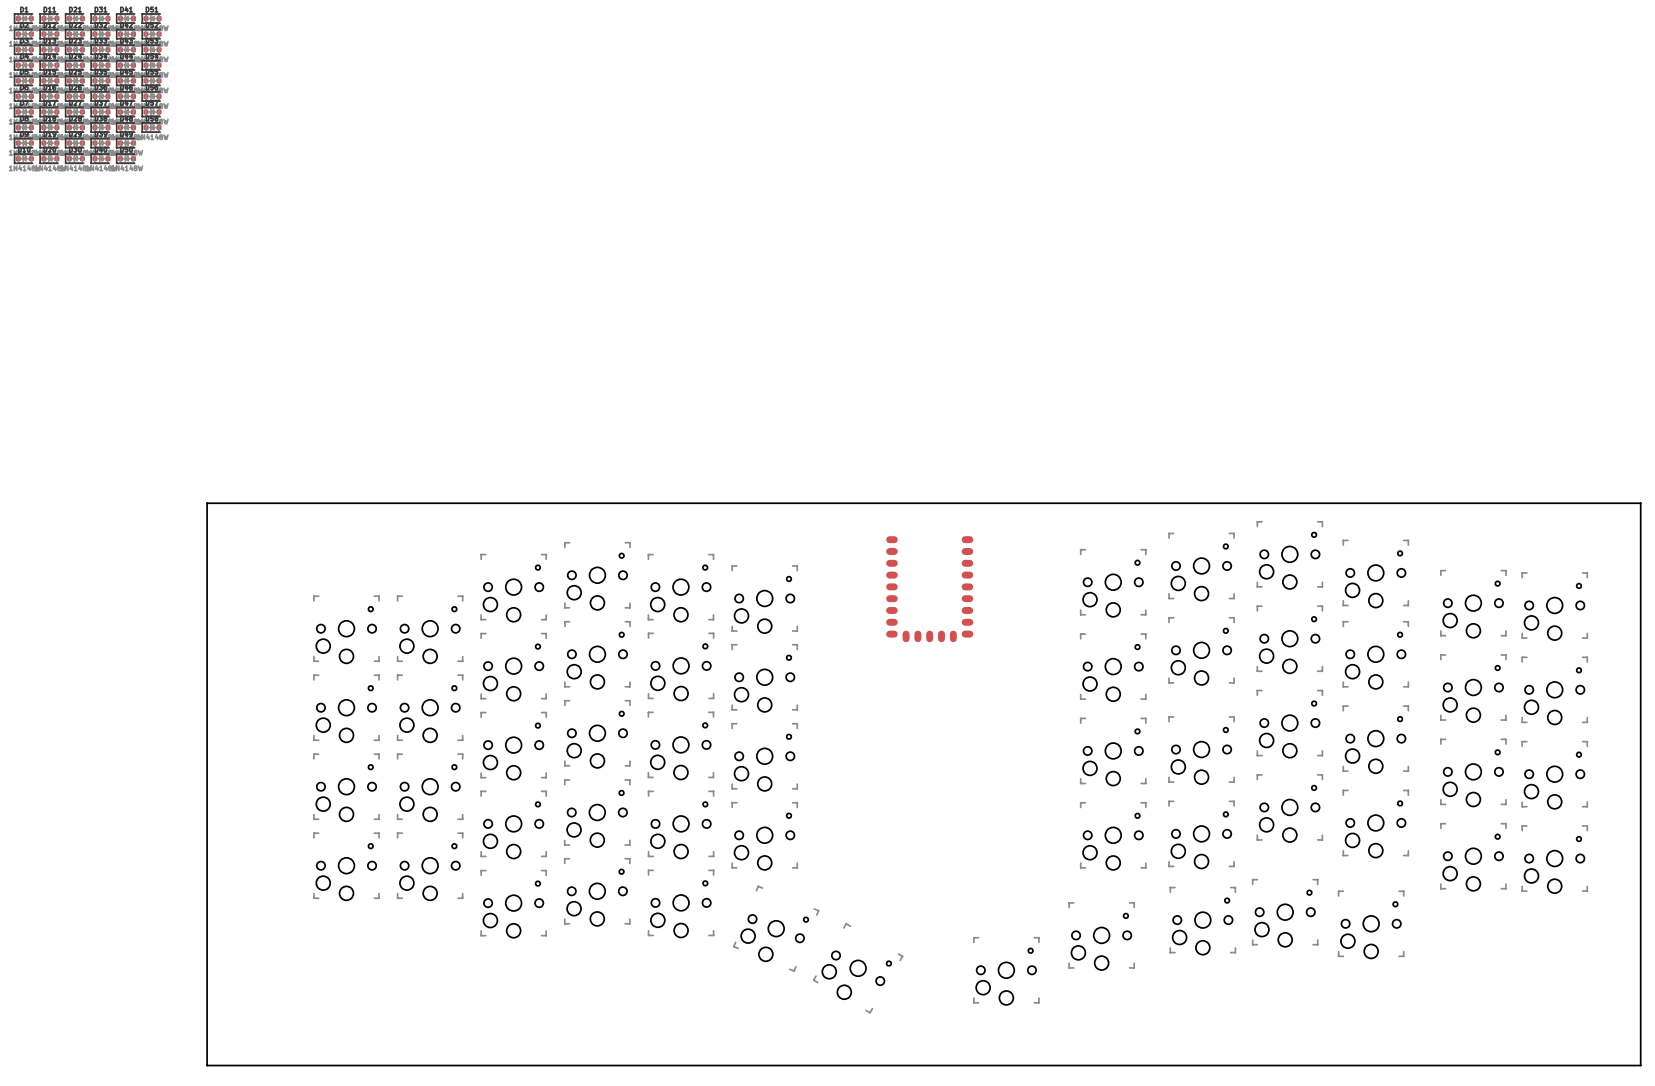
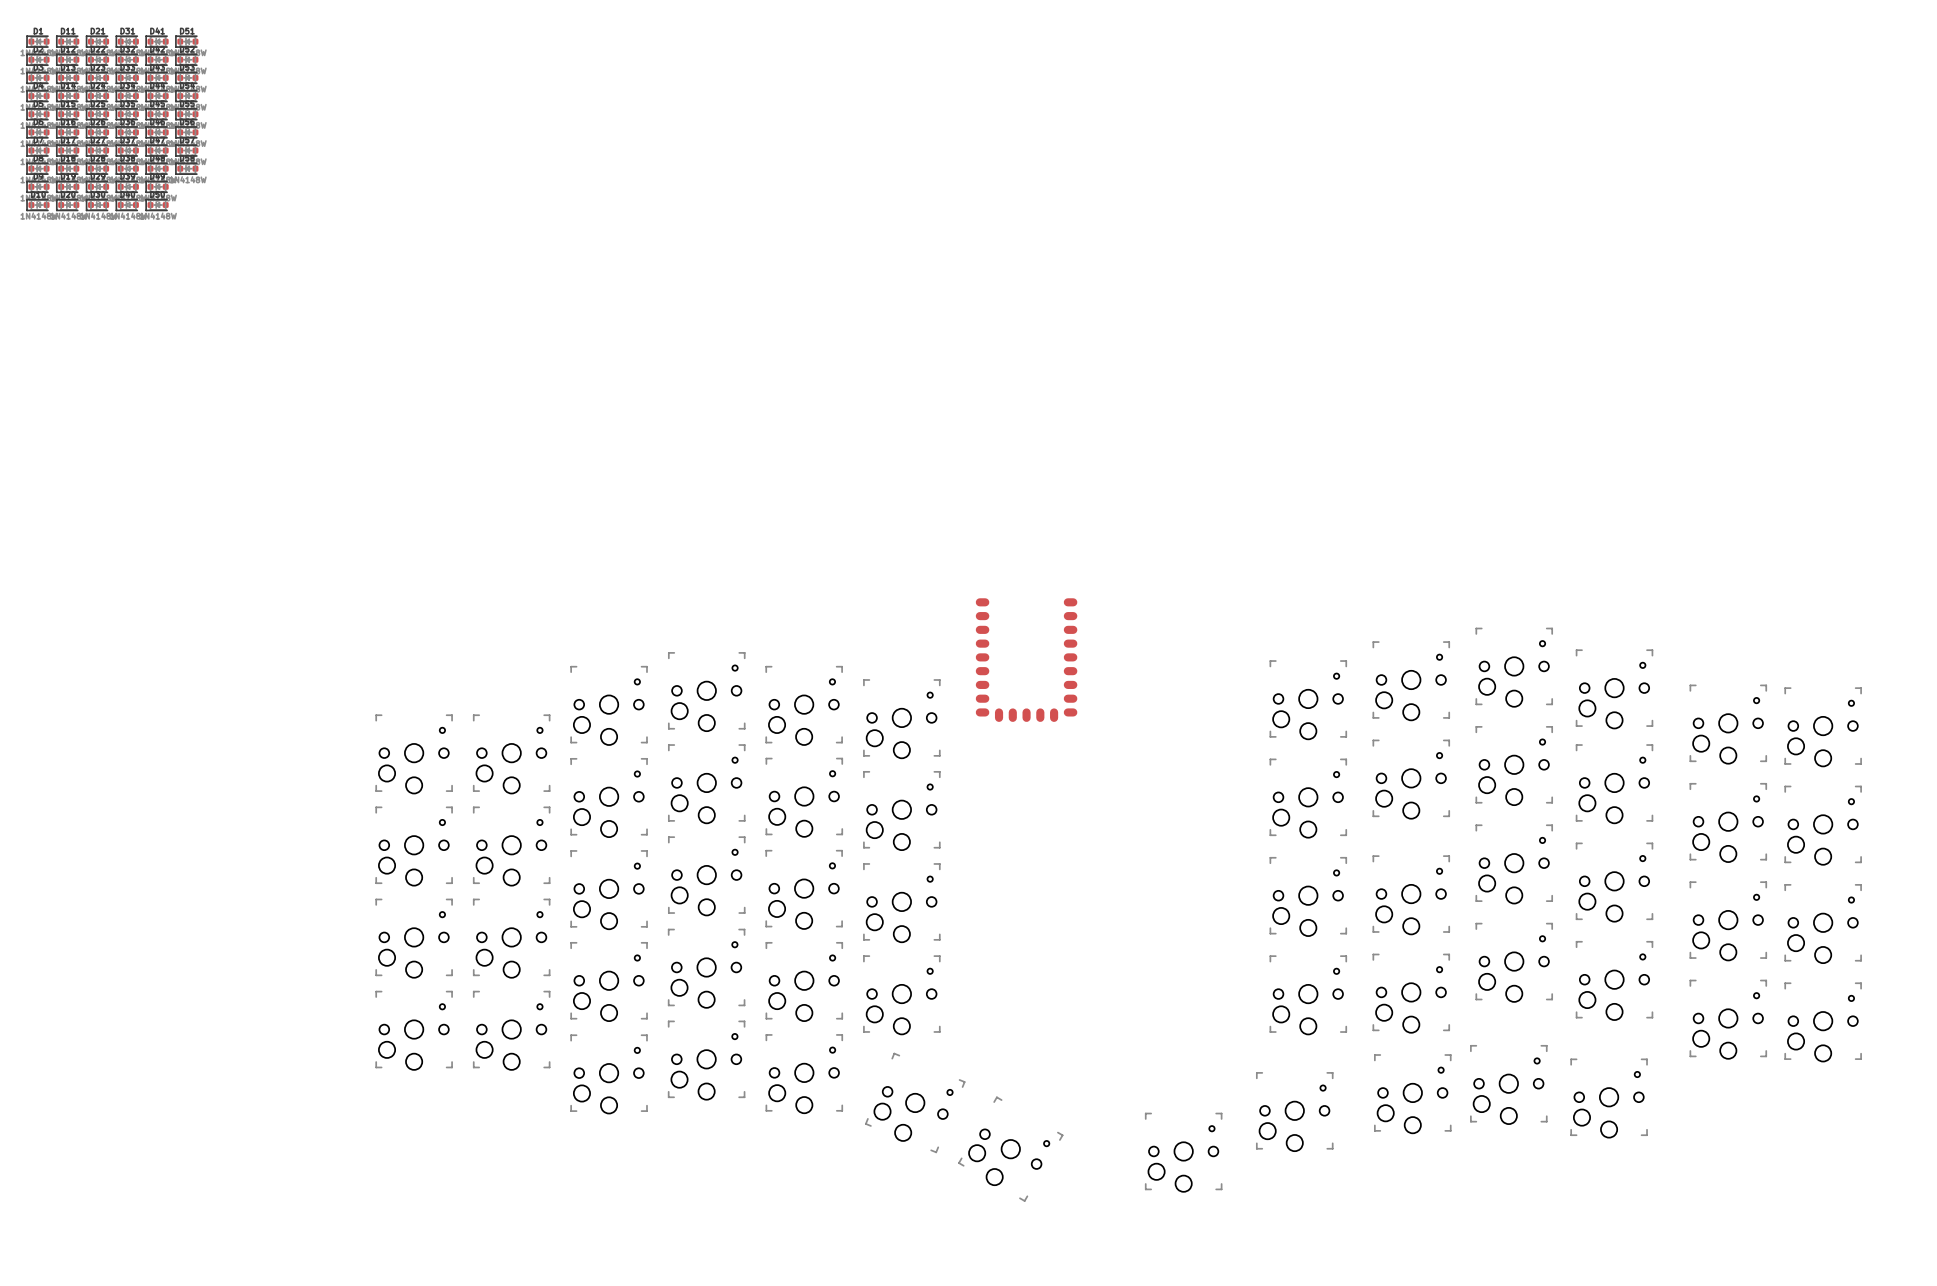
board edge: (207, 503) (1640, 503) (1640, 1065) (207, 1065) (207, 503) -> none
part position: (929, 589) -> (1026, 660)

